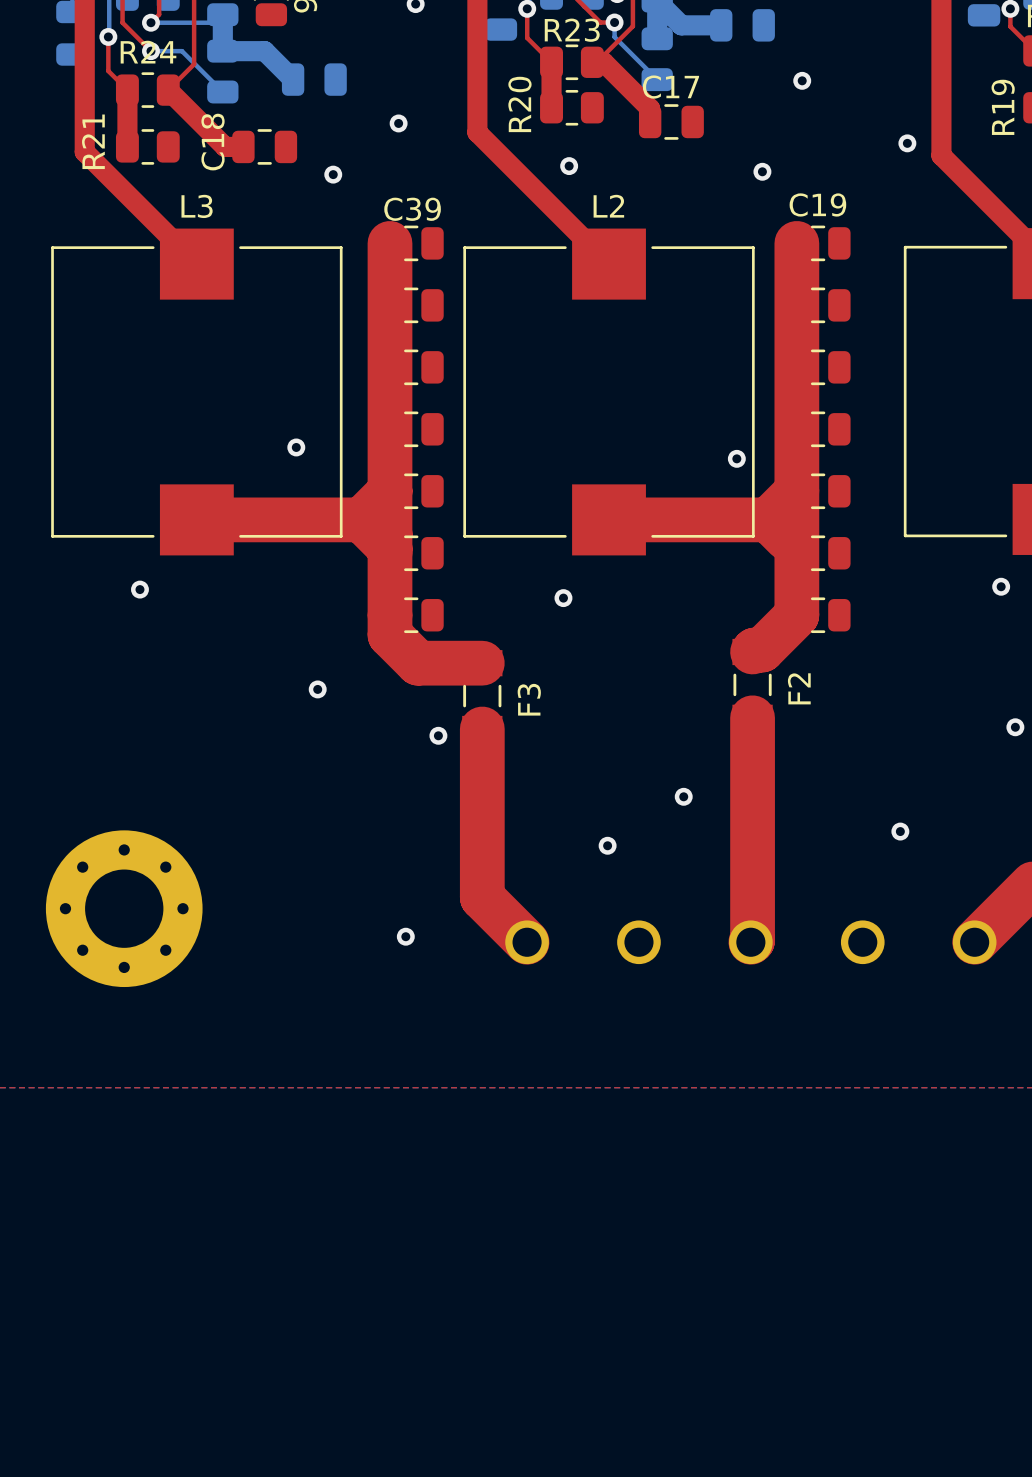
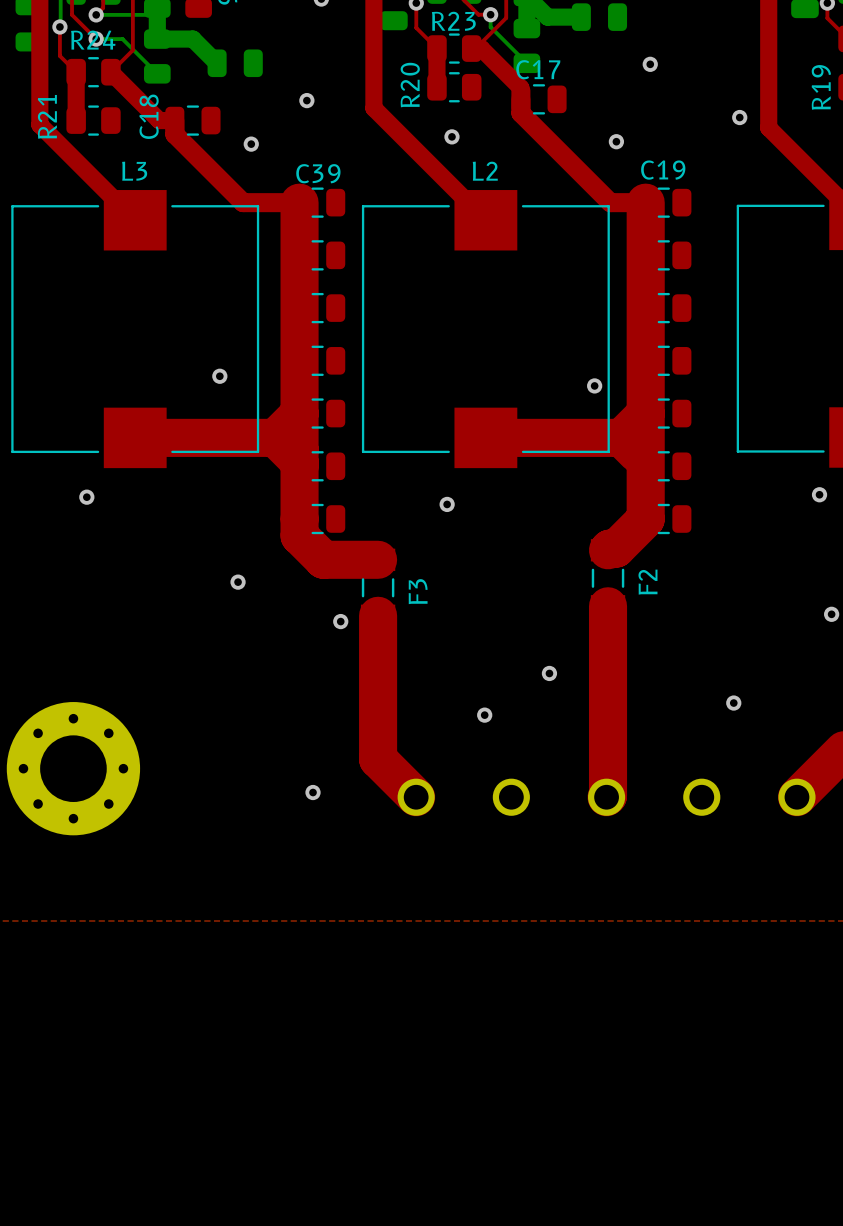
top track: none -> (520, 99) (520, 113) (610, 202) (645, 202)
top track: none -> (174, 120) (174, 134) (243, 202) (299, 202)

